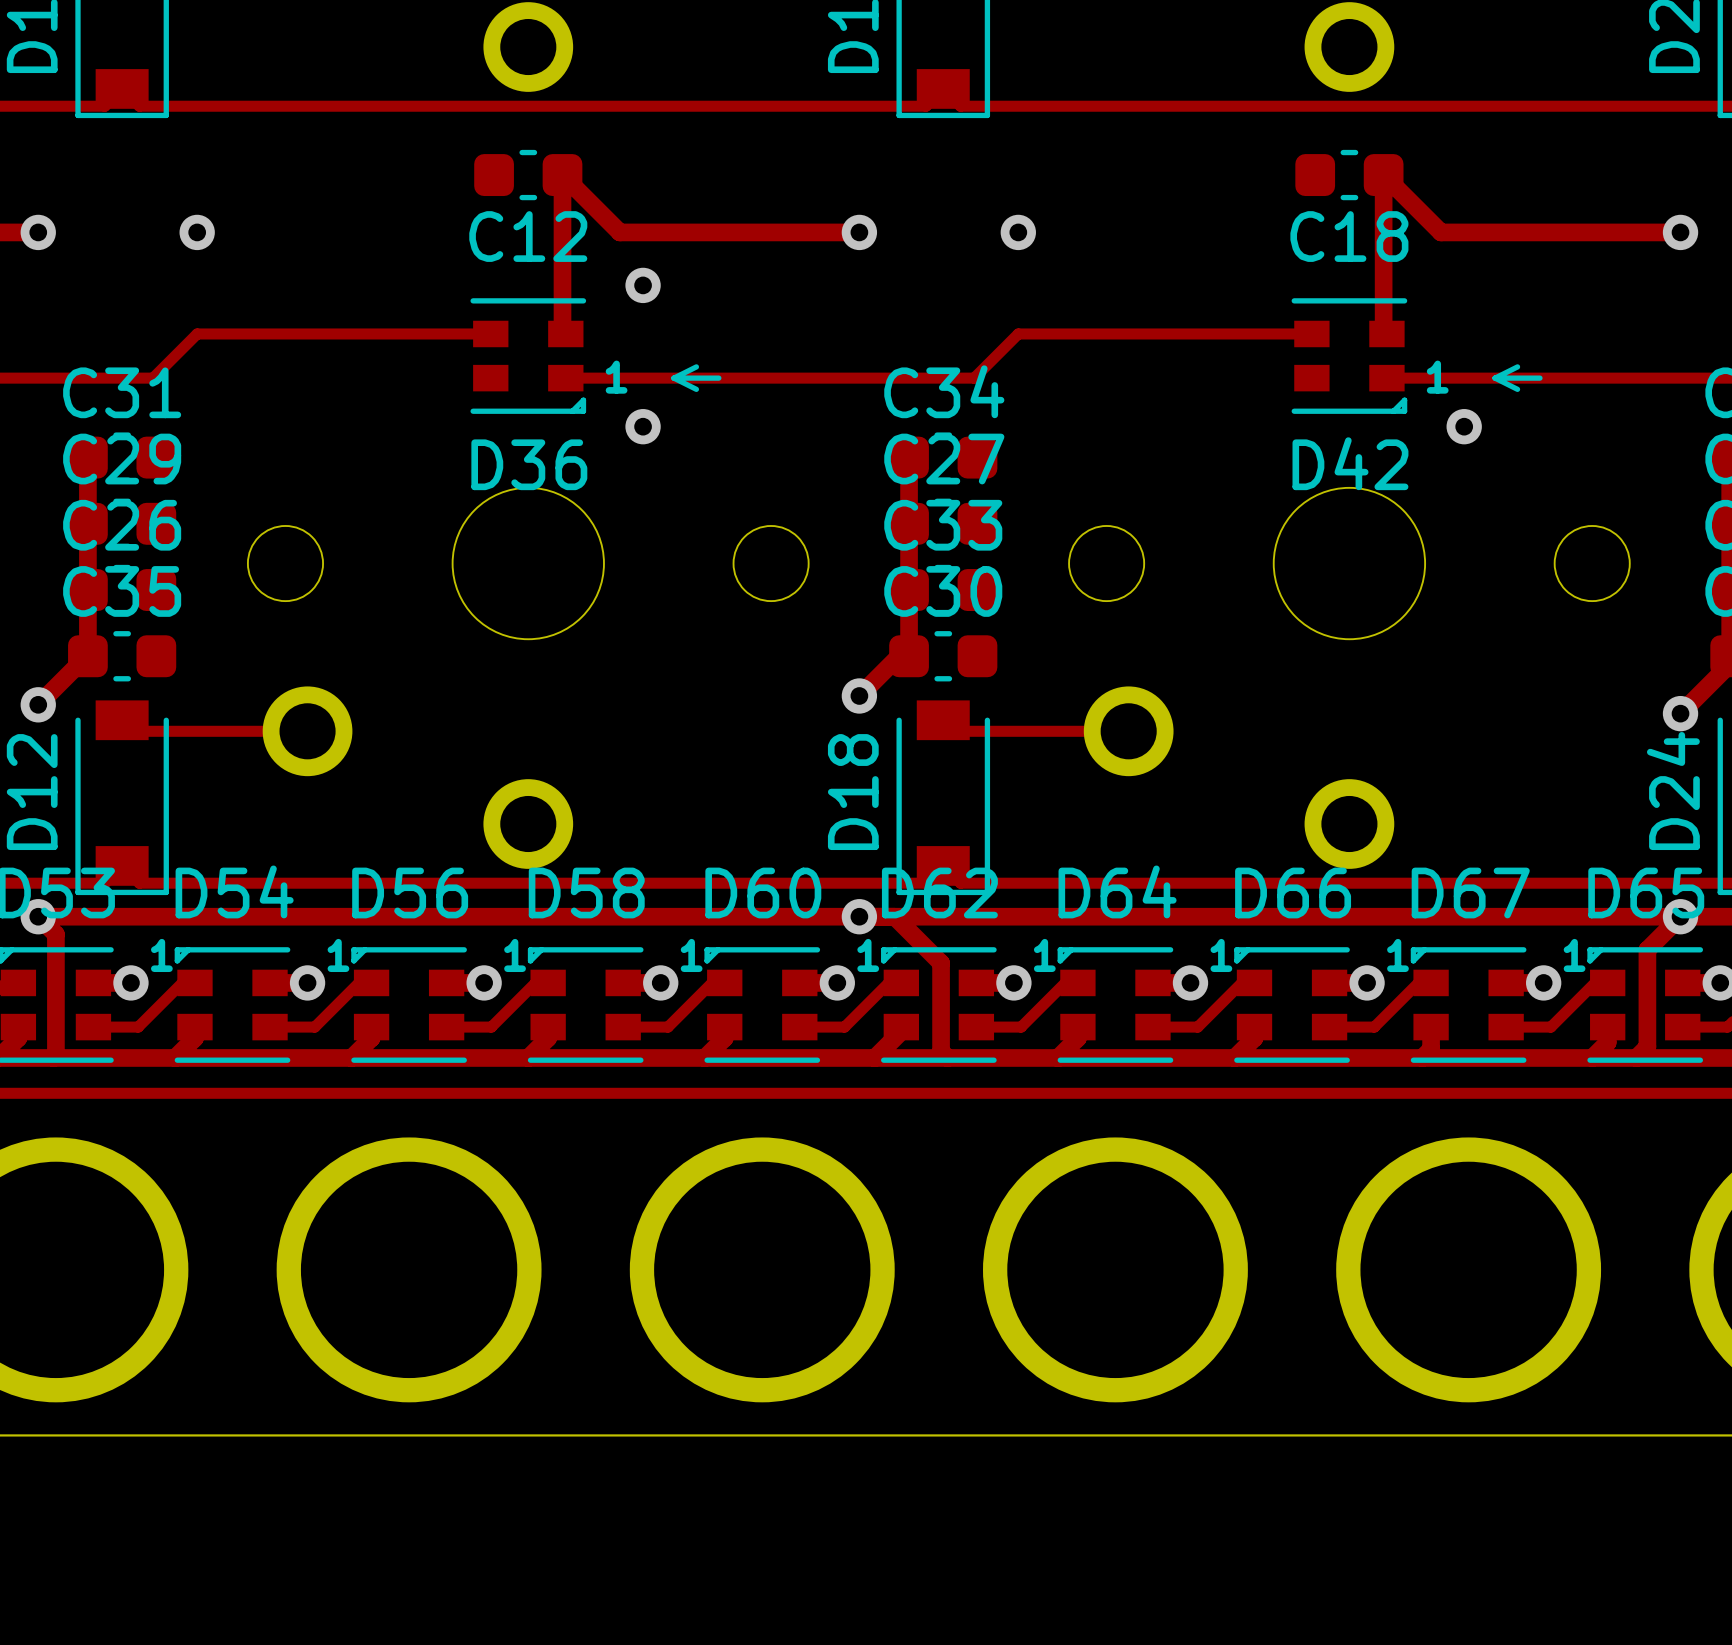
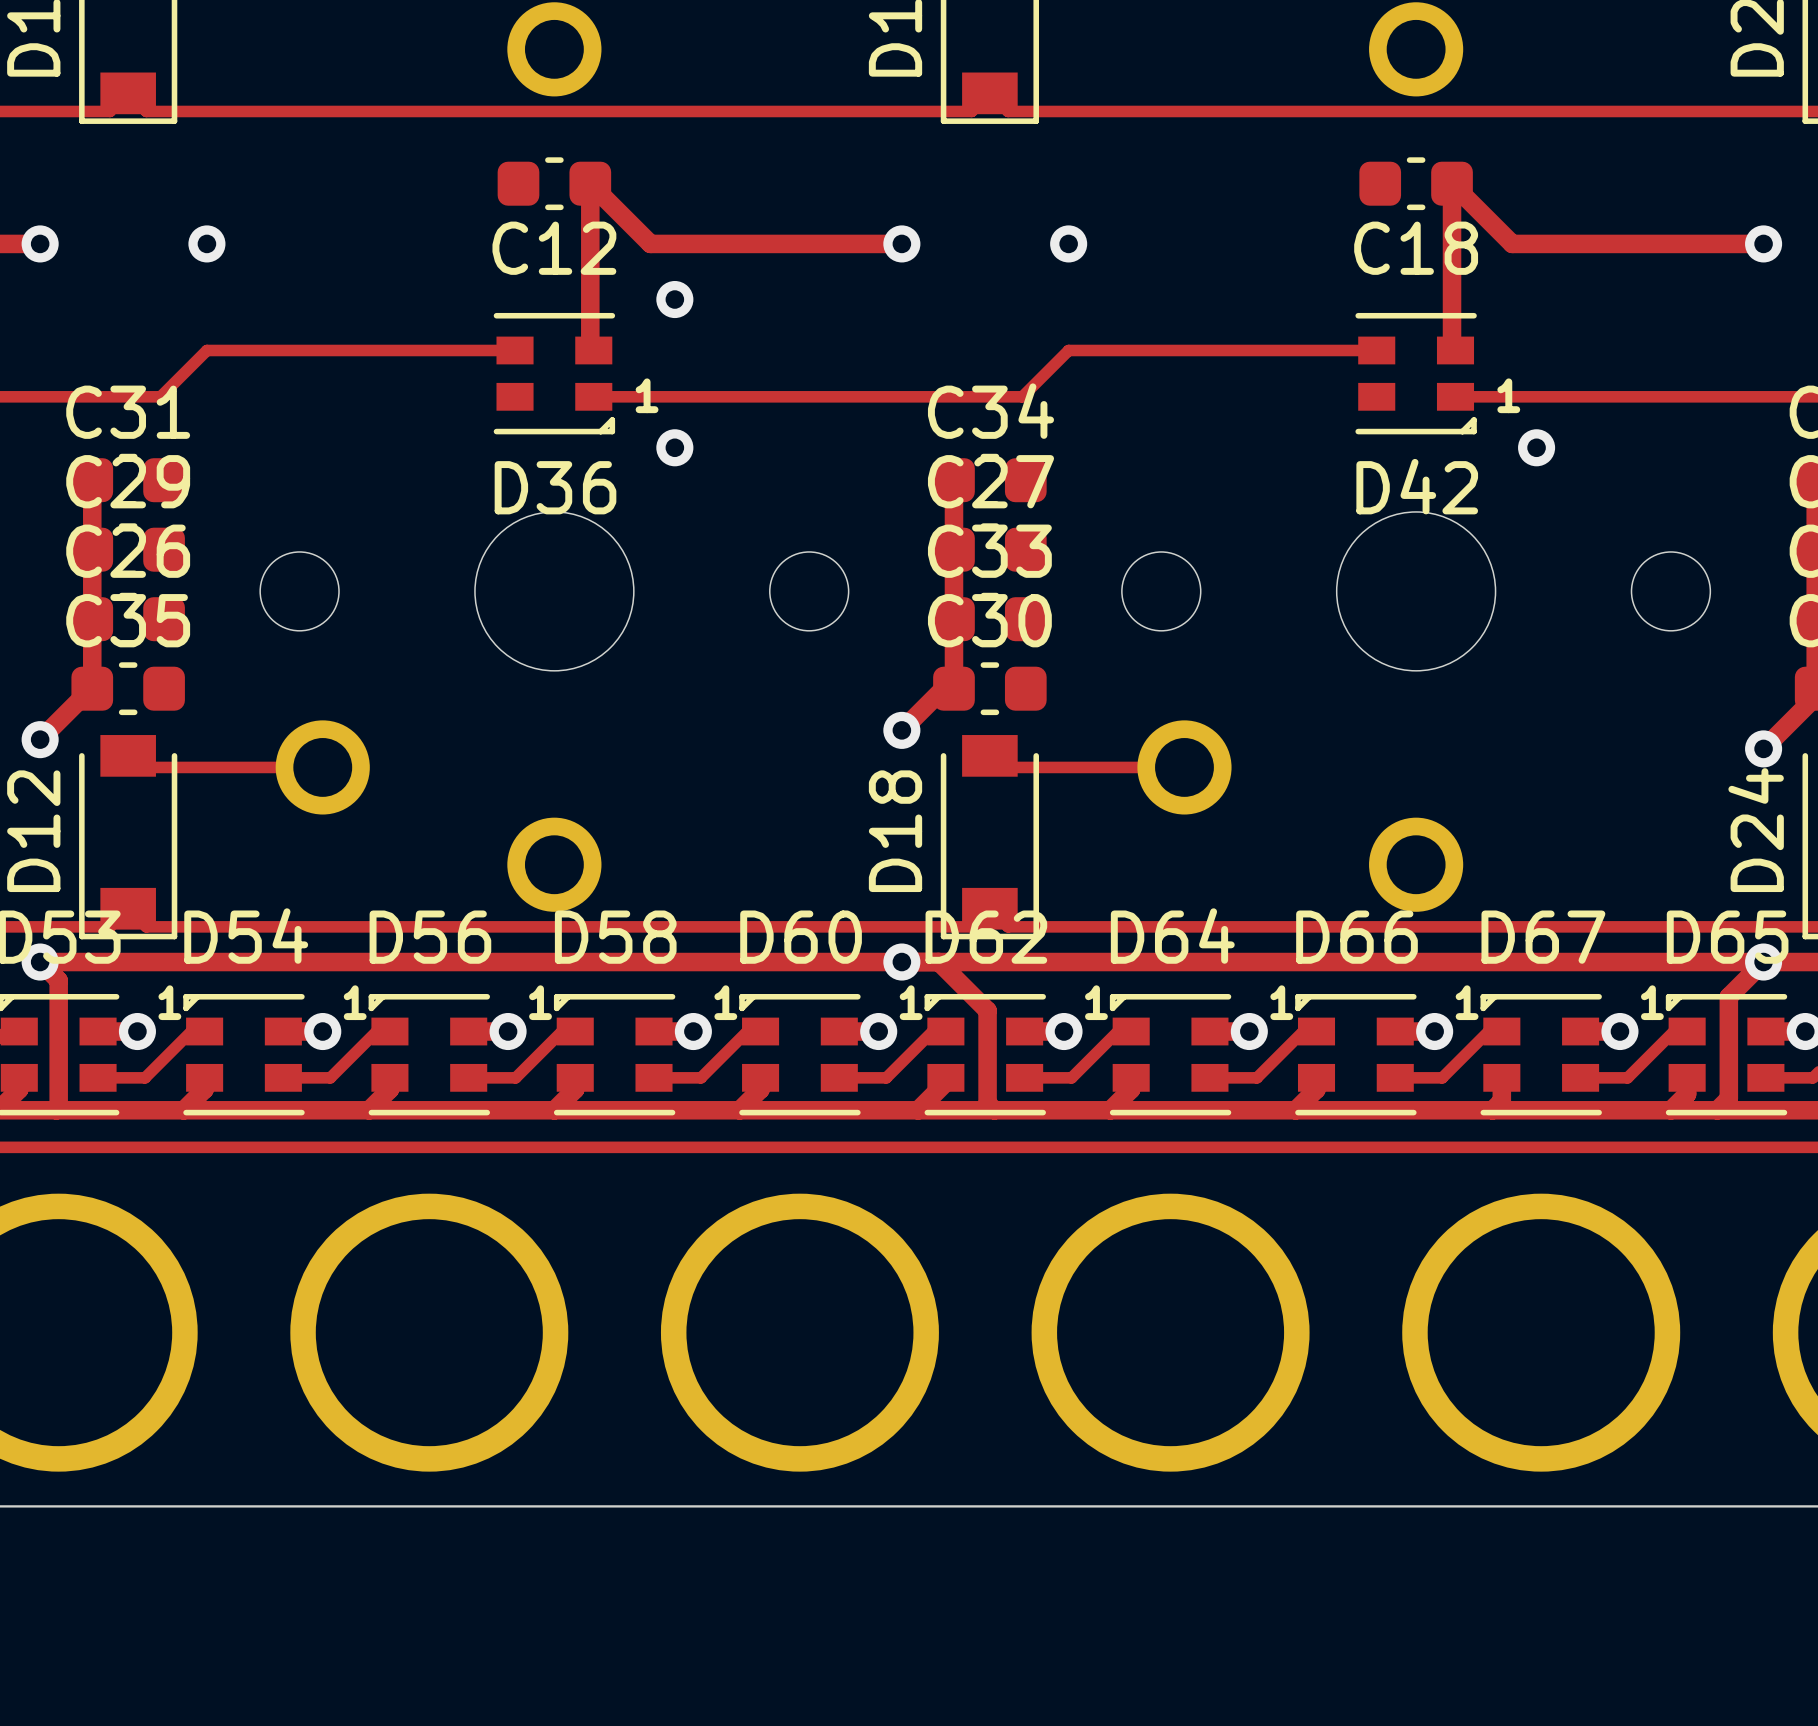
line: (696, 366) (673, 378) -> none
line: (1517, 366) (1495, 378) -> none
line: (673, 378) (696, 389) -> none
line: (673, 378) (718, 378) -> none
line: (1495, 378) (1539, 378) -> none
line: (1495, 378) (1517, 389) -> none

